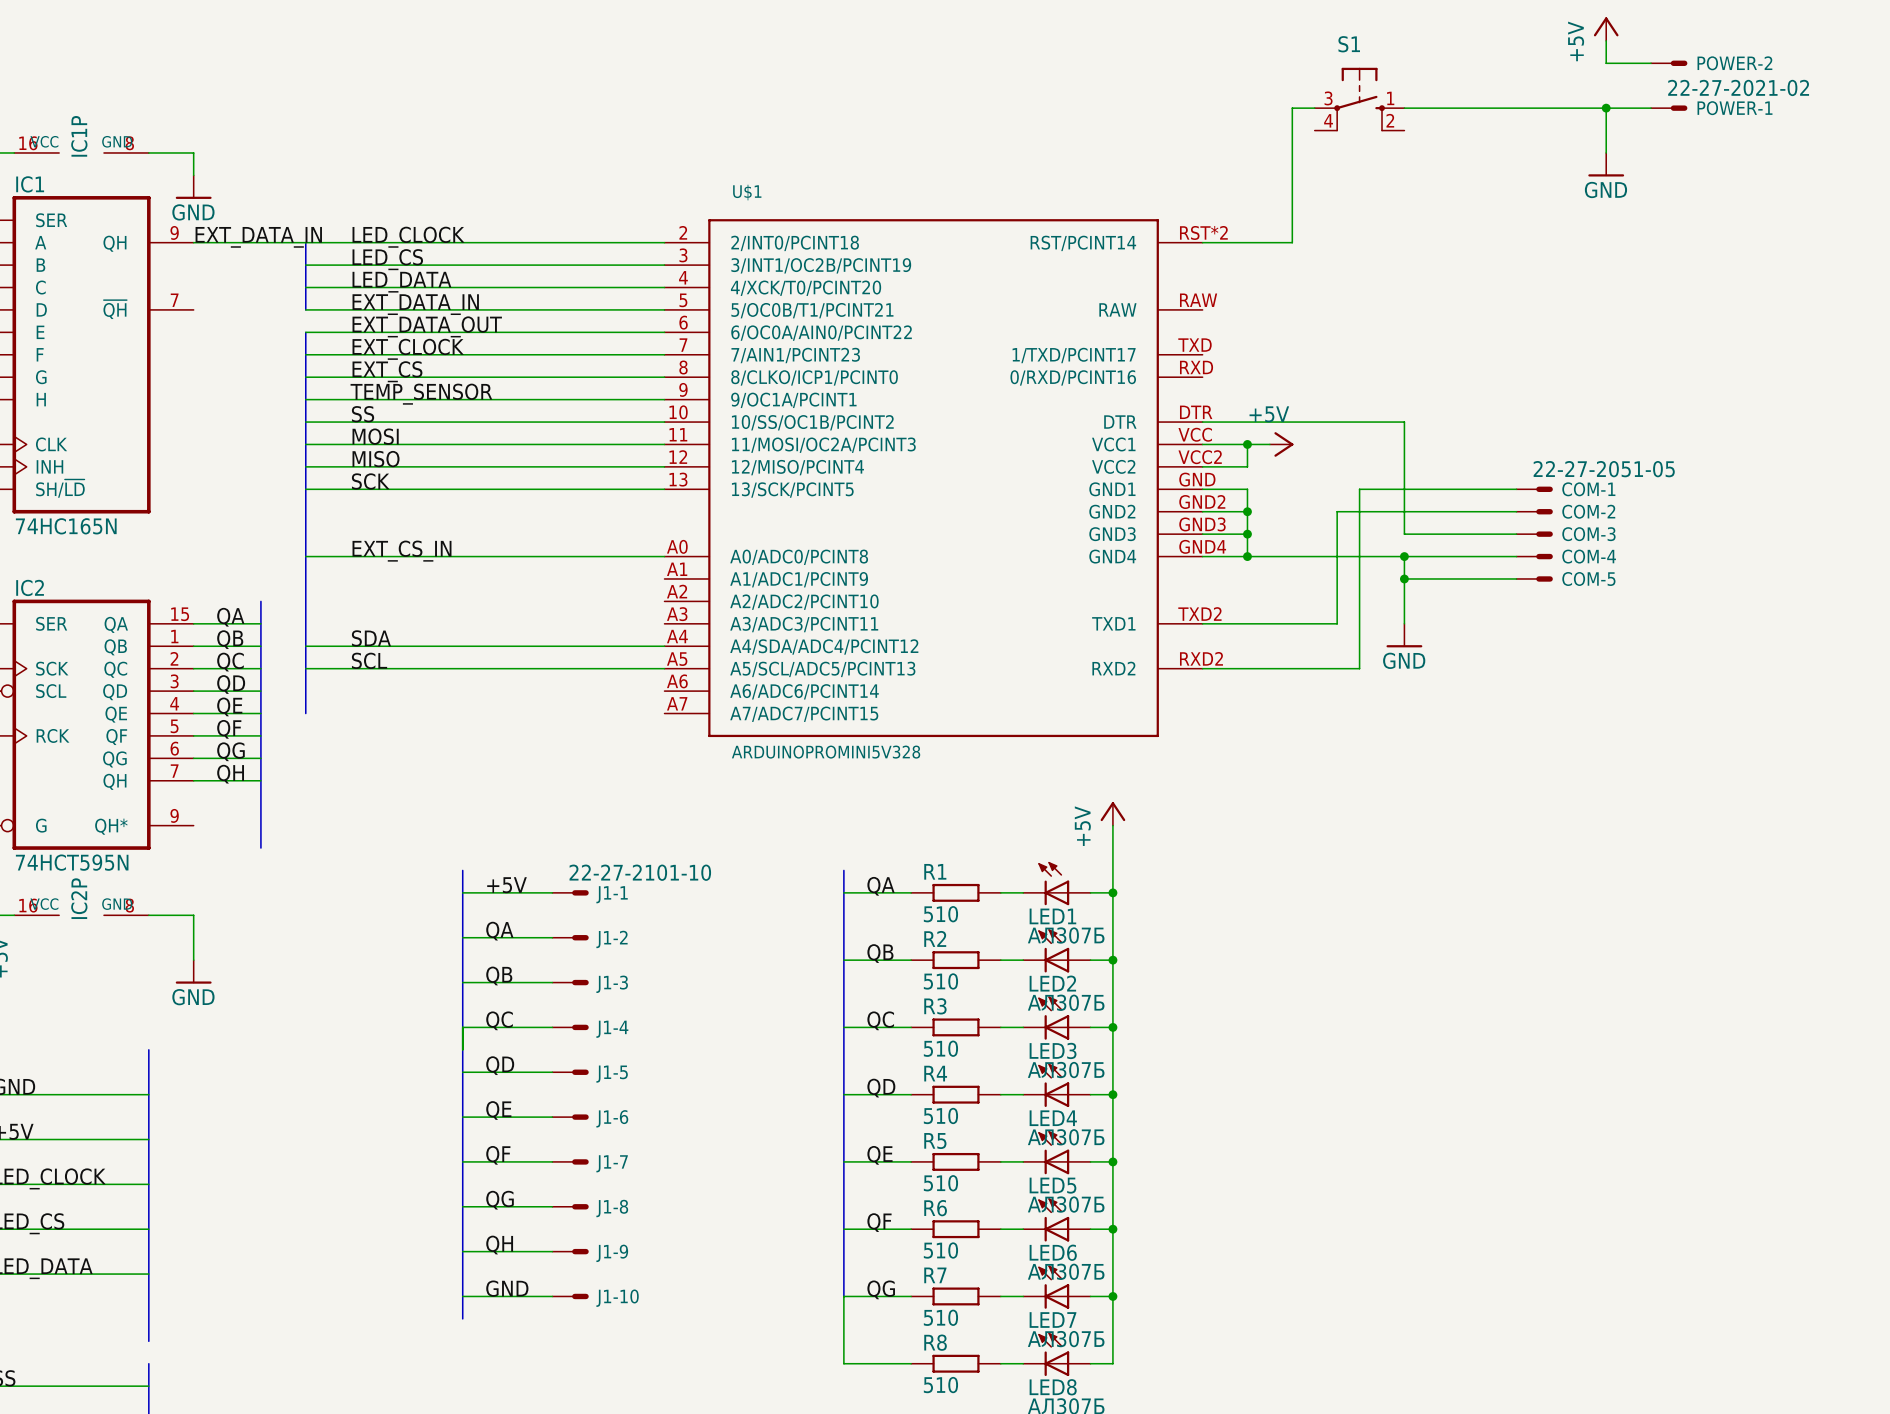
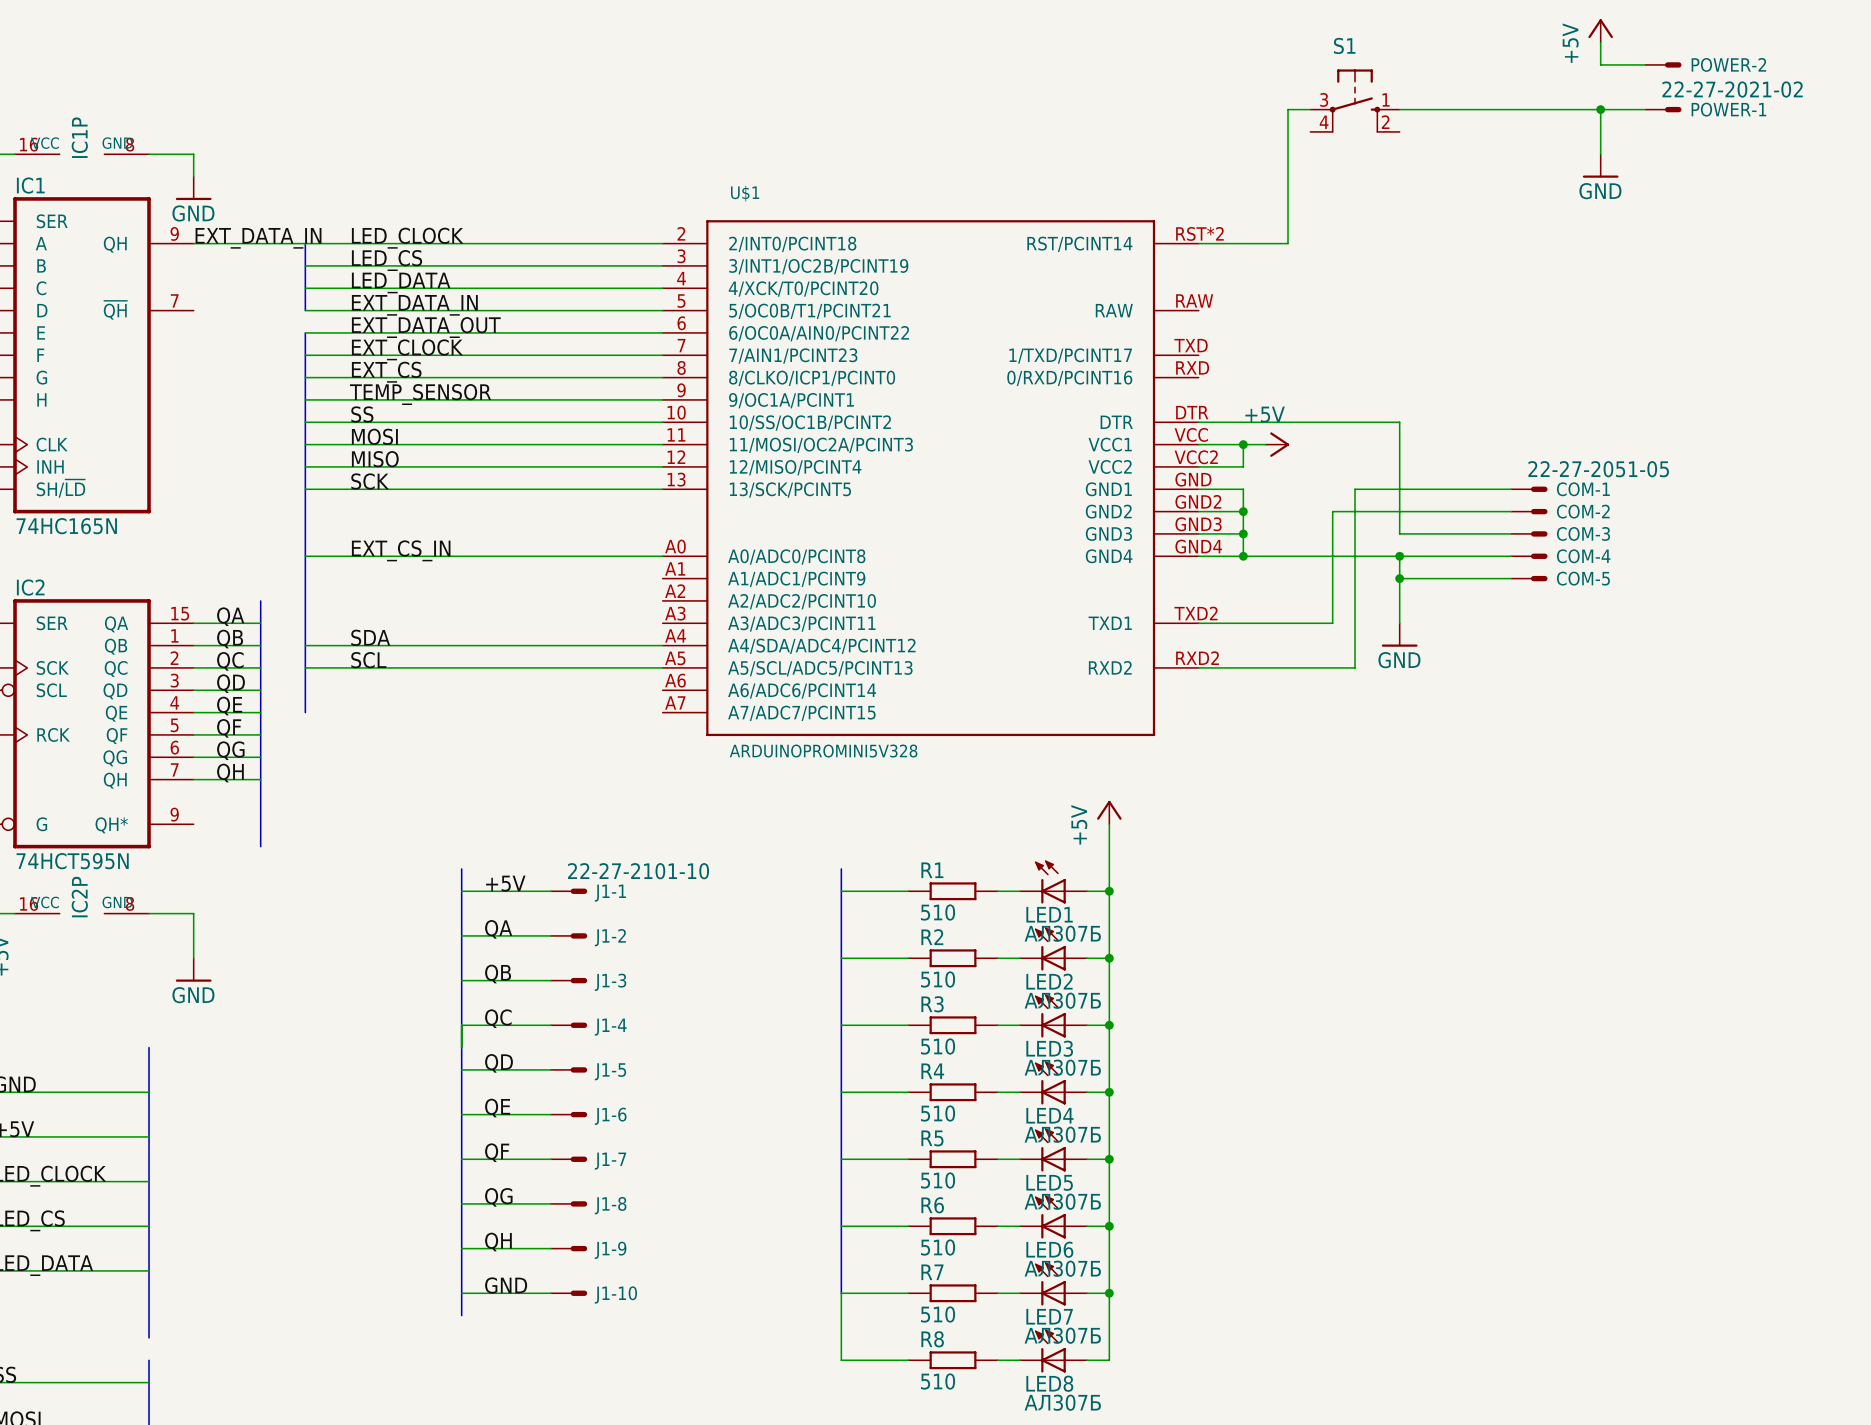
label: QA (881, 886) -> none
label: QB (880, 953) -> none
label: QC (880, 1020) -> none
label: QD (881, 1088) -> none
label: QE (879, 1155) -> none
label: QF (879, 1222) -> none
label: QG (881, 1289) -> none

